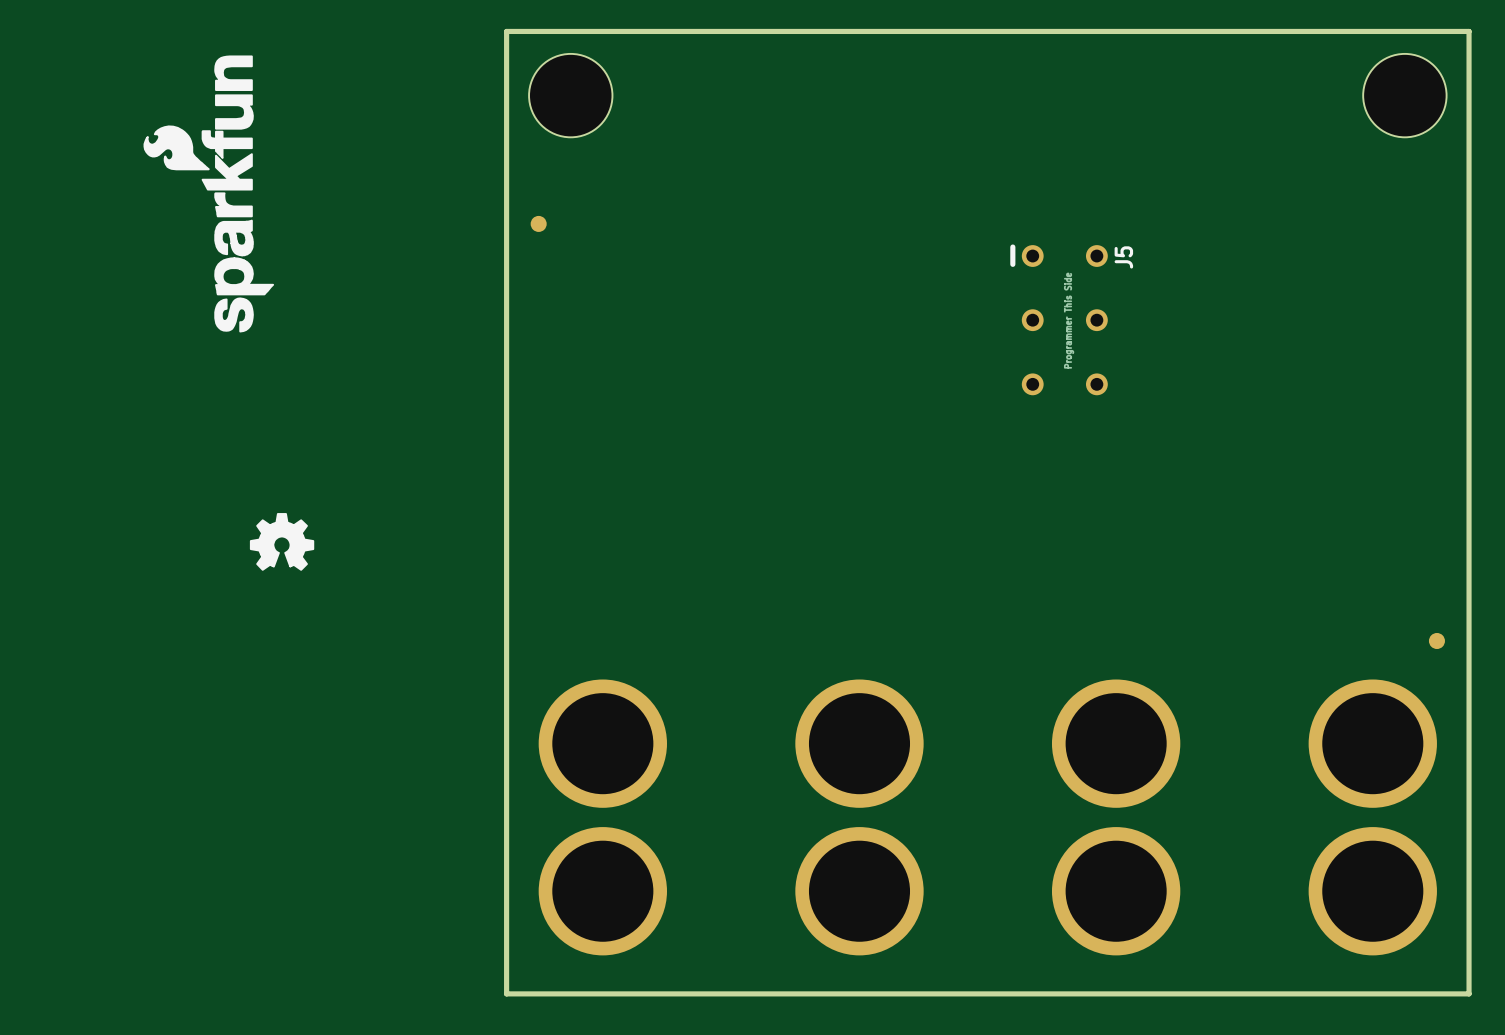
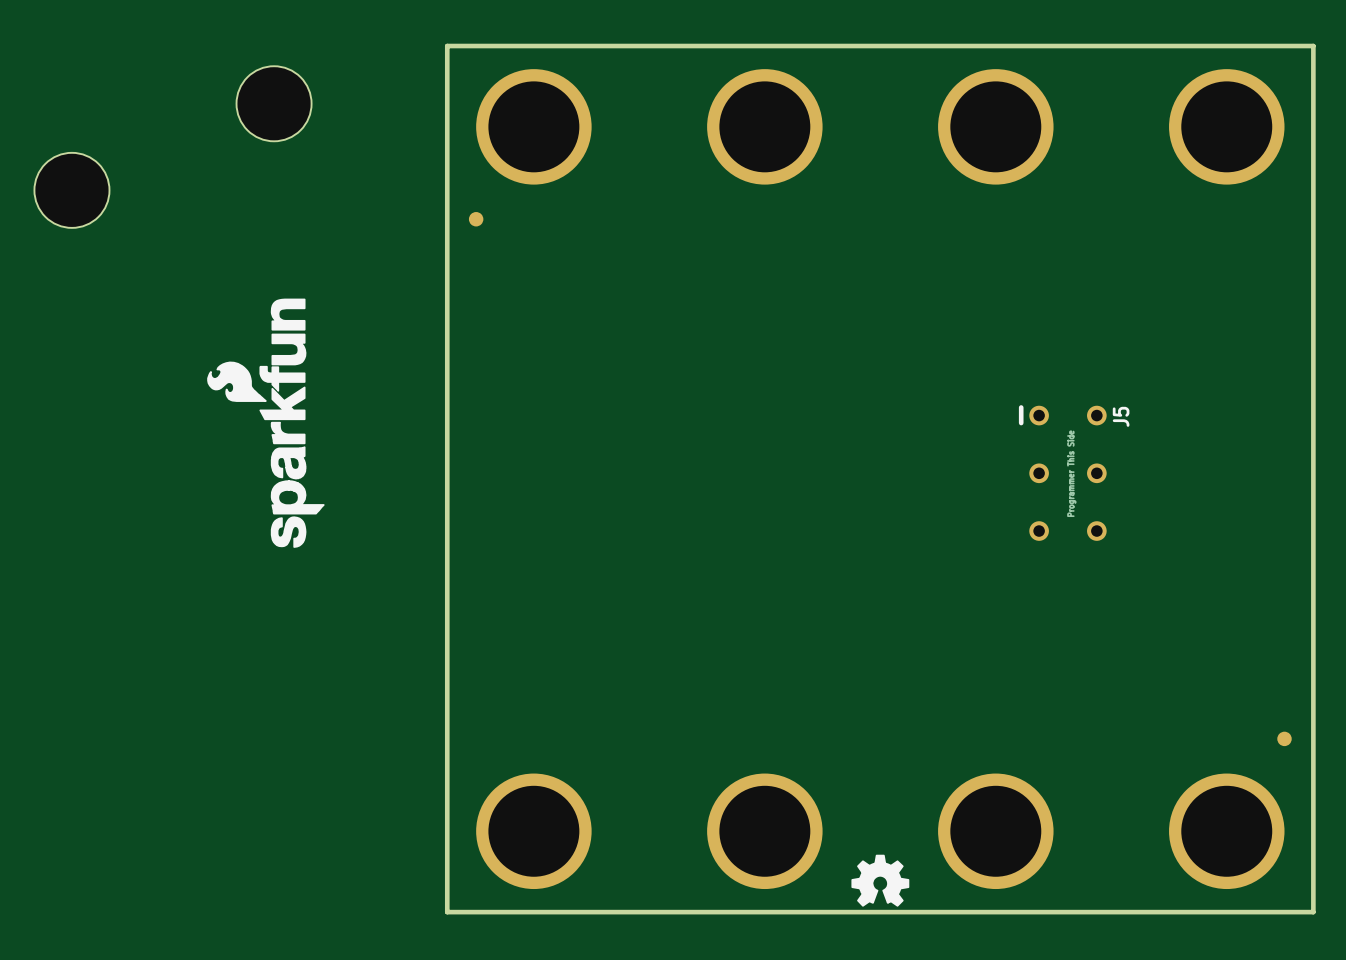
part: none -> (274, 103)
part: (570, 95) -> none
part: (1404, 95) -> none
part: none -> (533, 126)
part: none -> (764, 126)
part: none -> (995, 126)
part: none -> (1226, 126)
part: none -> (71, 190)
drawing position: (208, 193) -> (265, 423)
J5 position: (1059, 319) -> (1062, 473)
drawing: [249, 513, 315, 571] -> none
part position: (1436, 640) -> (1284, 738)
part: (602, 817) -> none
part: (859, 817) -> none
part: (1116, 817) -> none
part: (1372, 817) -> none
part: none -> (533, 831)
part: none -> (764, 831)
part: none -> (995, 831)
part: none -> (1226, 831)
drawing: none -> [851, 854, 910, 907]

